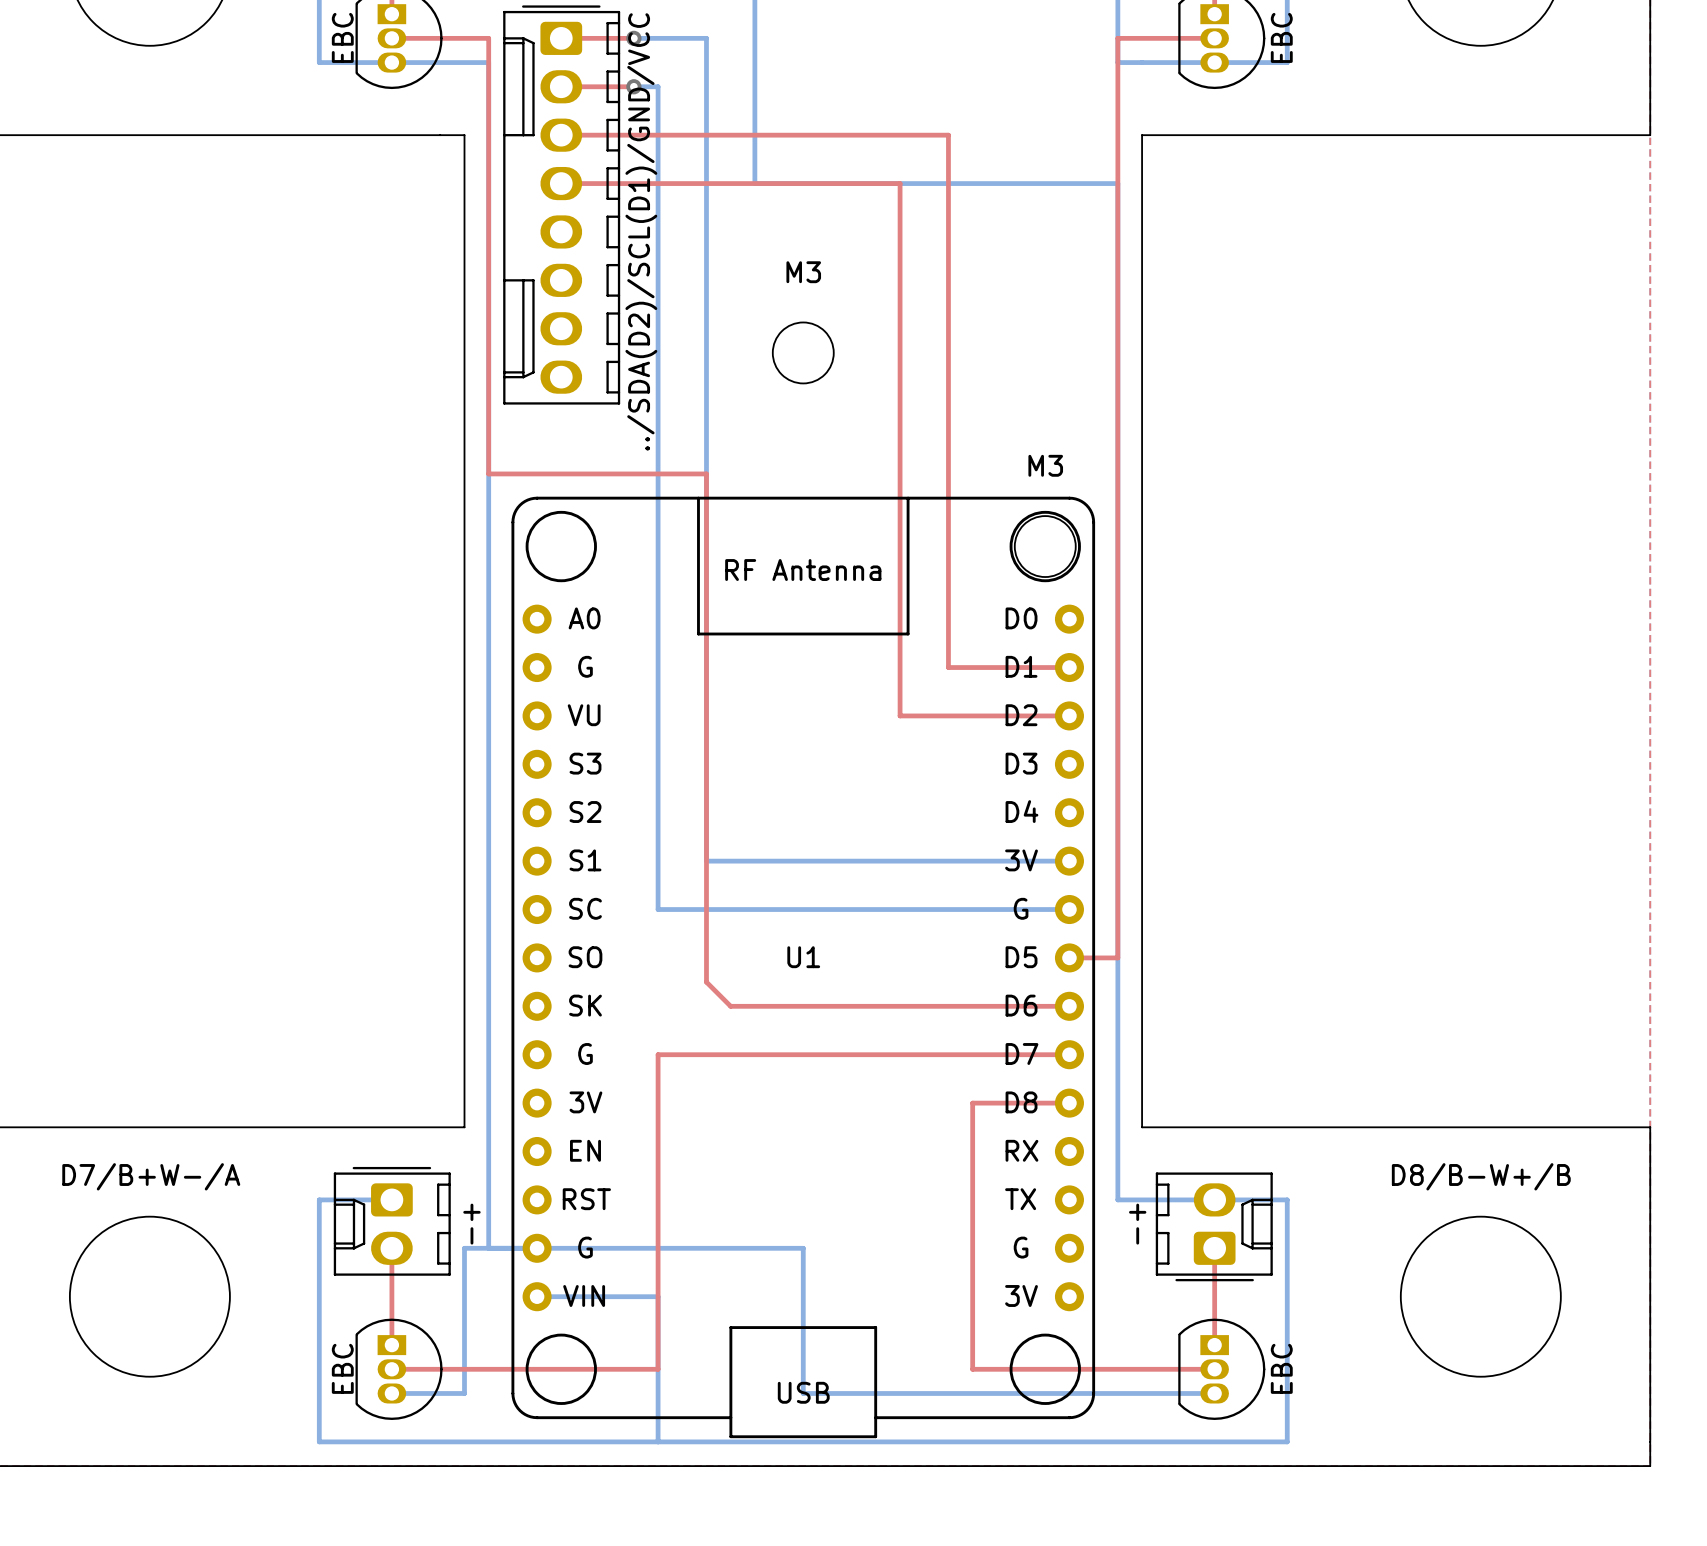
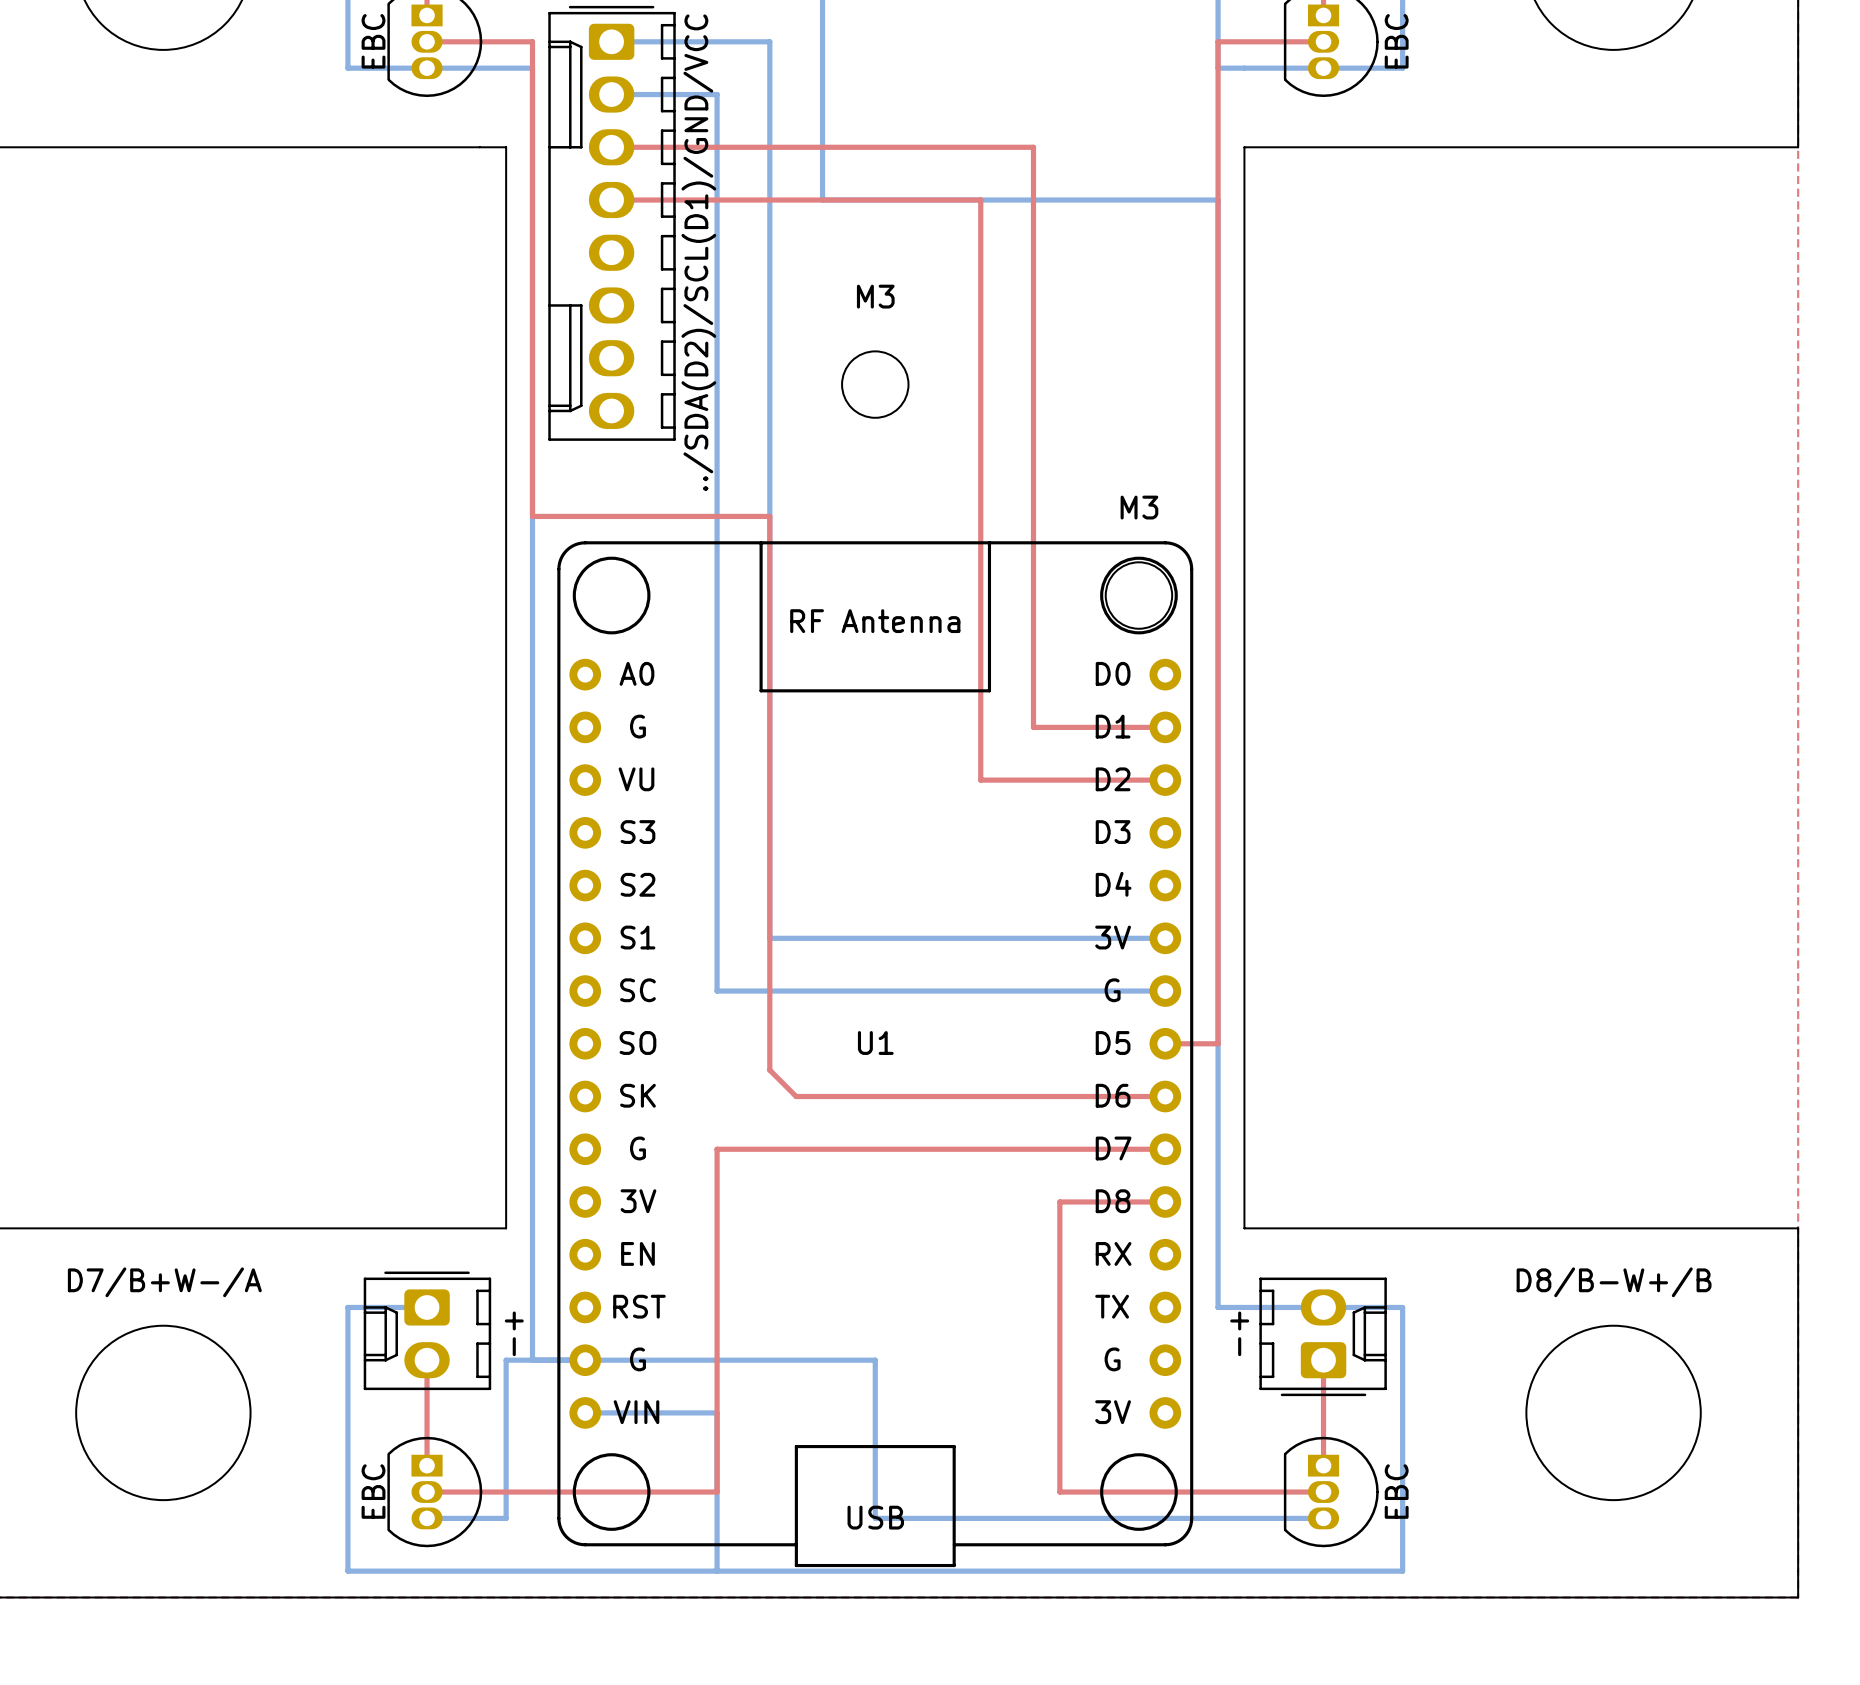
bottom track: none -> (611, 41) (690, 41)
top track: (561, 38) (633, 38) -> none
via: (633, 38) -> none
bottom track: none -> (611, 94) (690, 94)
top track: (561, 86) (633, 86) -> none
via: (633, 86) -> none

